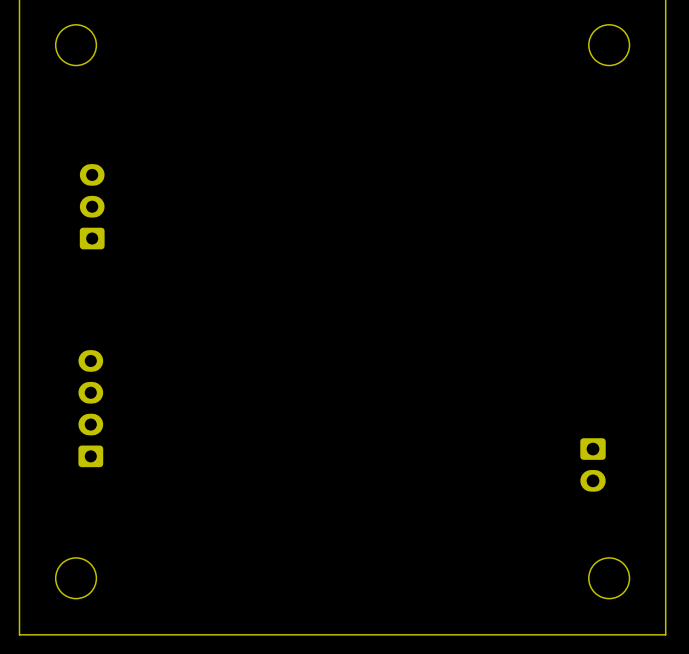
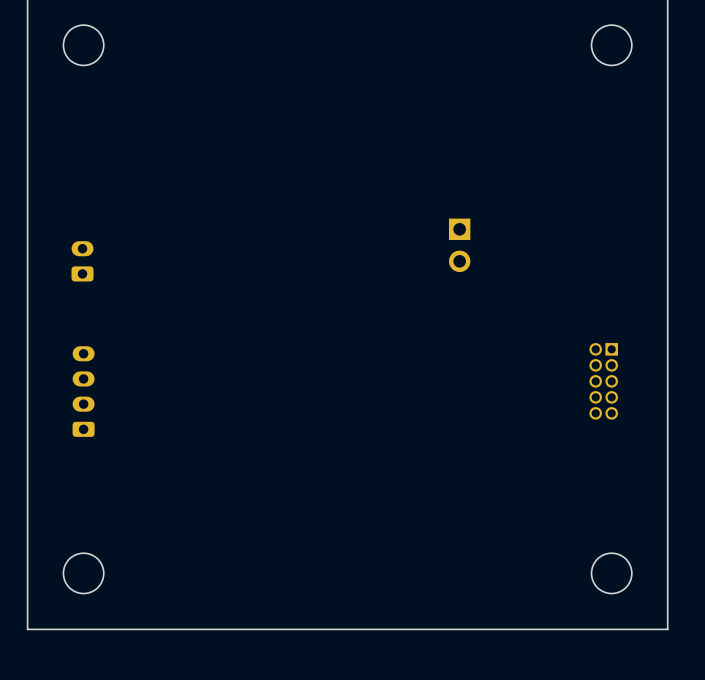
part: (92, 206) -> none
part: none -> (459, 245)
part: none -> (82, 261)
part: none -> (603, 381)
part: none -> (83, 391)
part: (90, 408) -> none
part: (593, 464) -> none

